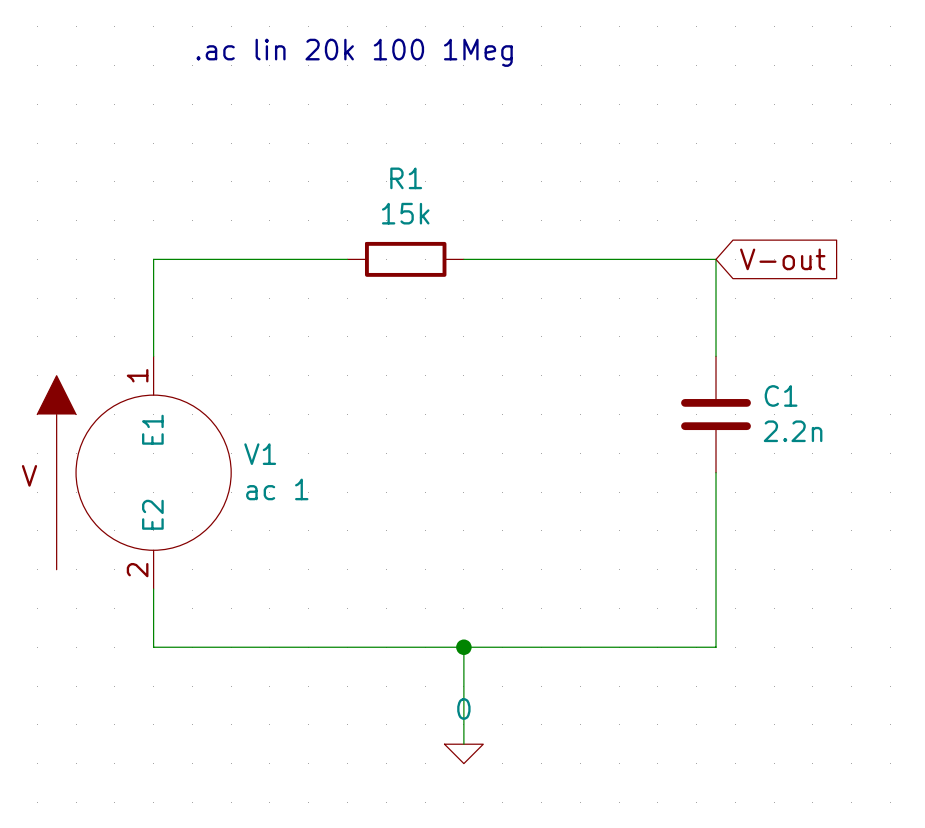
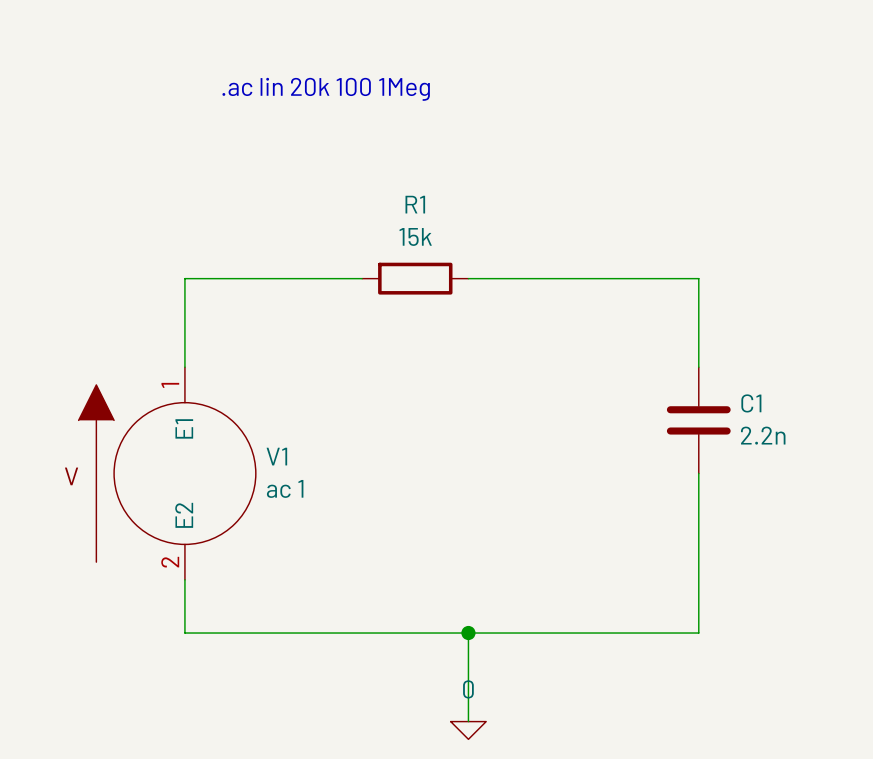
global label: V-out (782, 259) -> none

